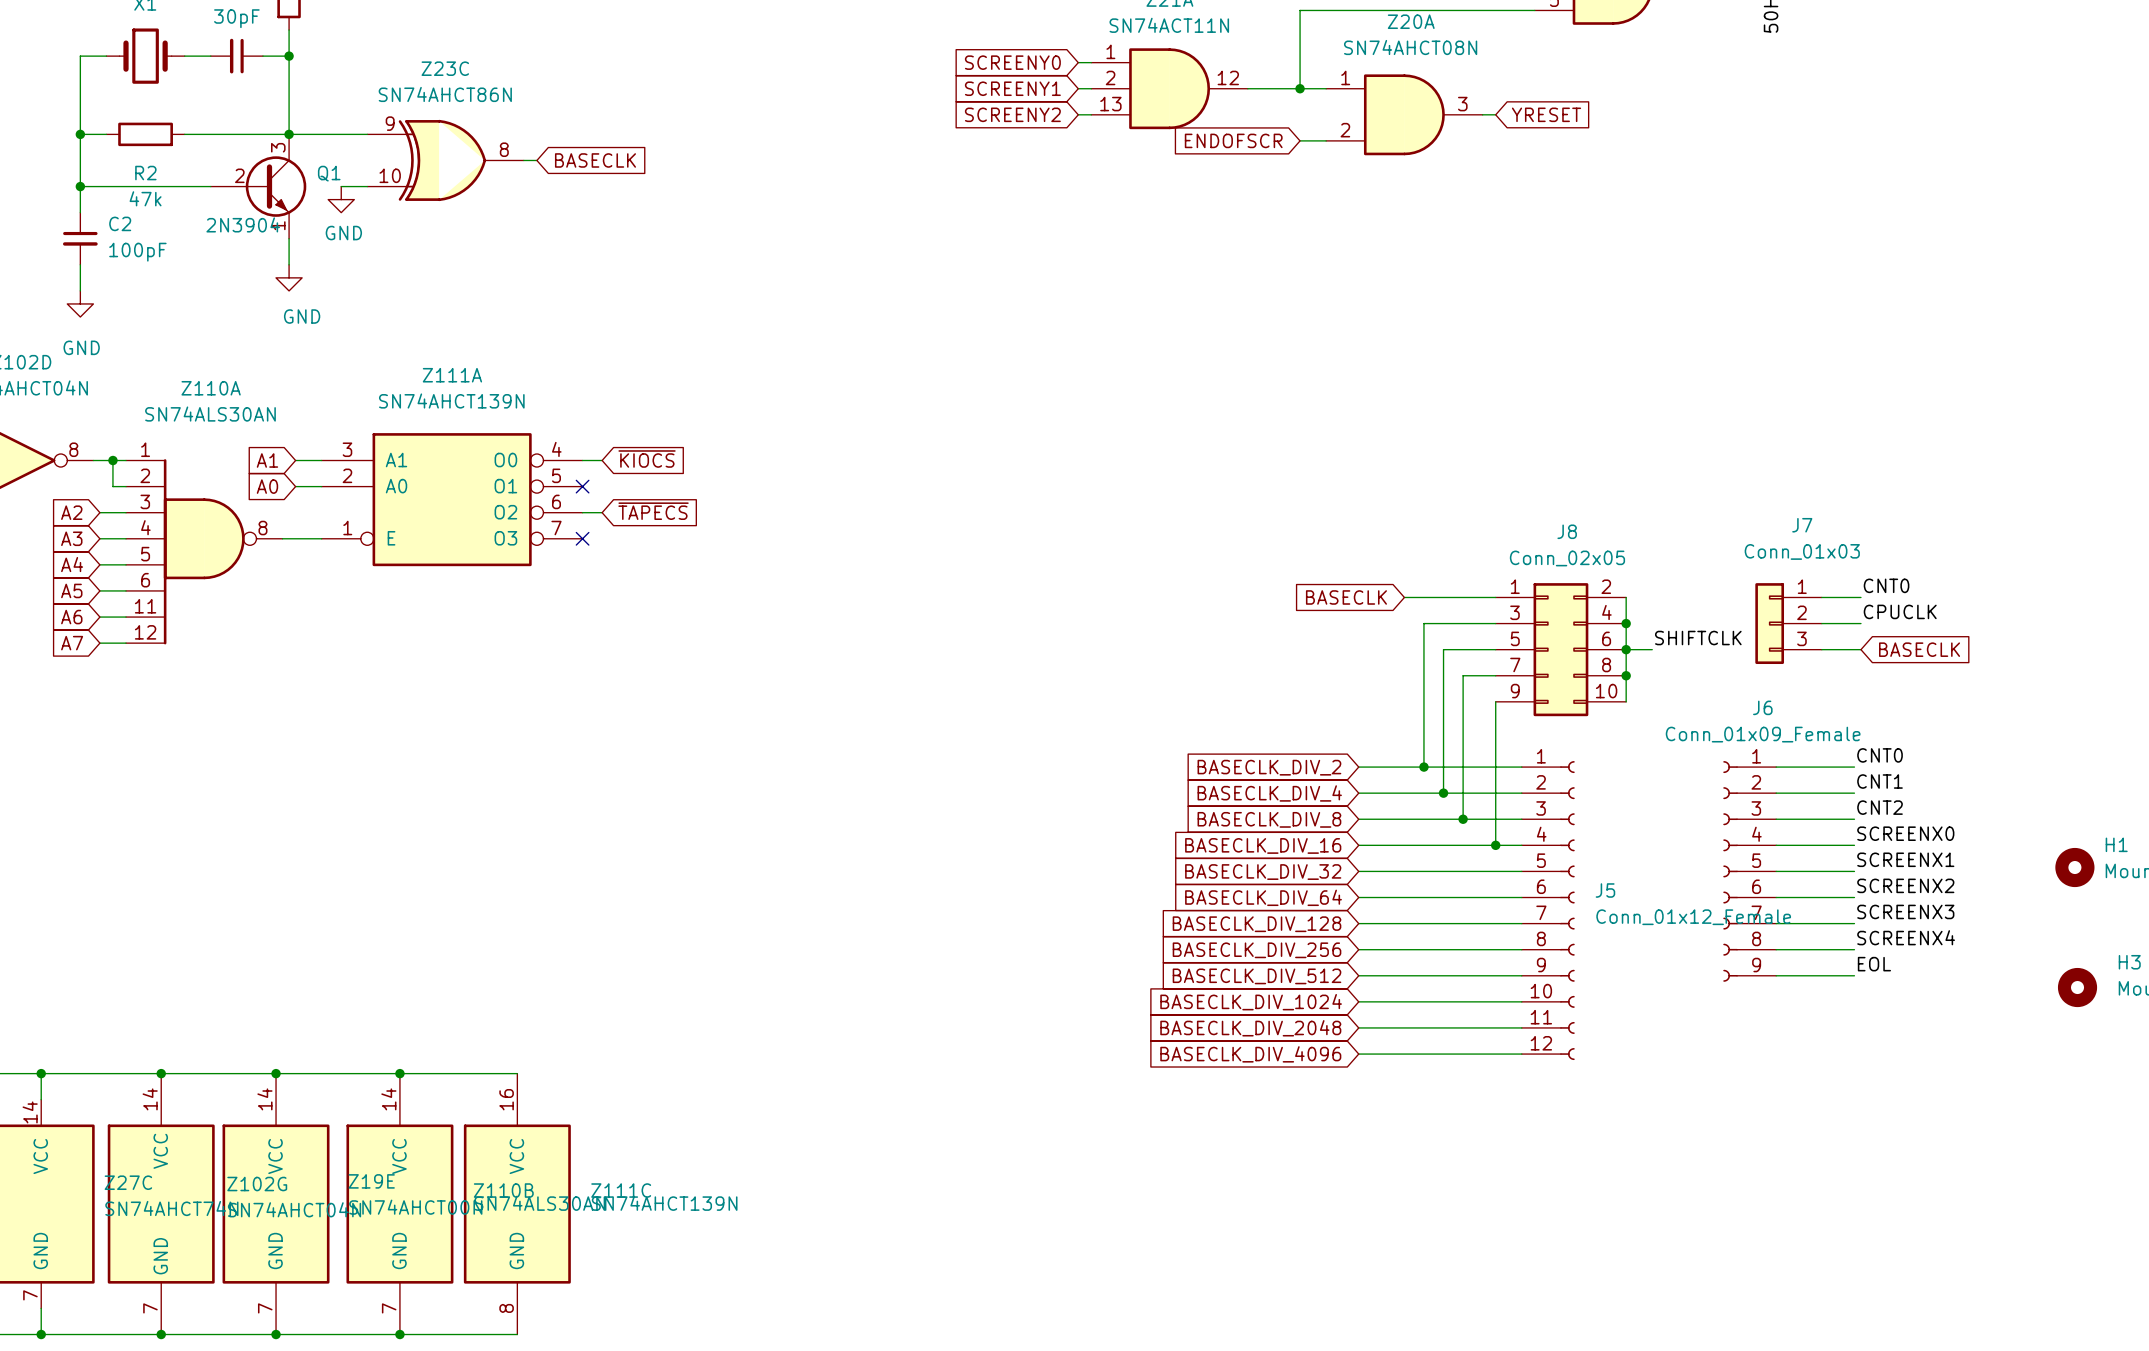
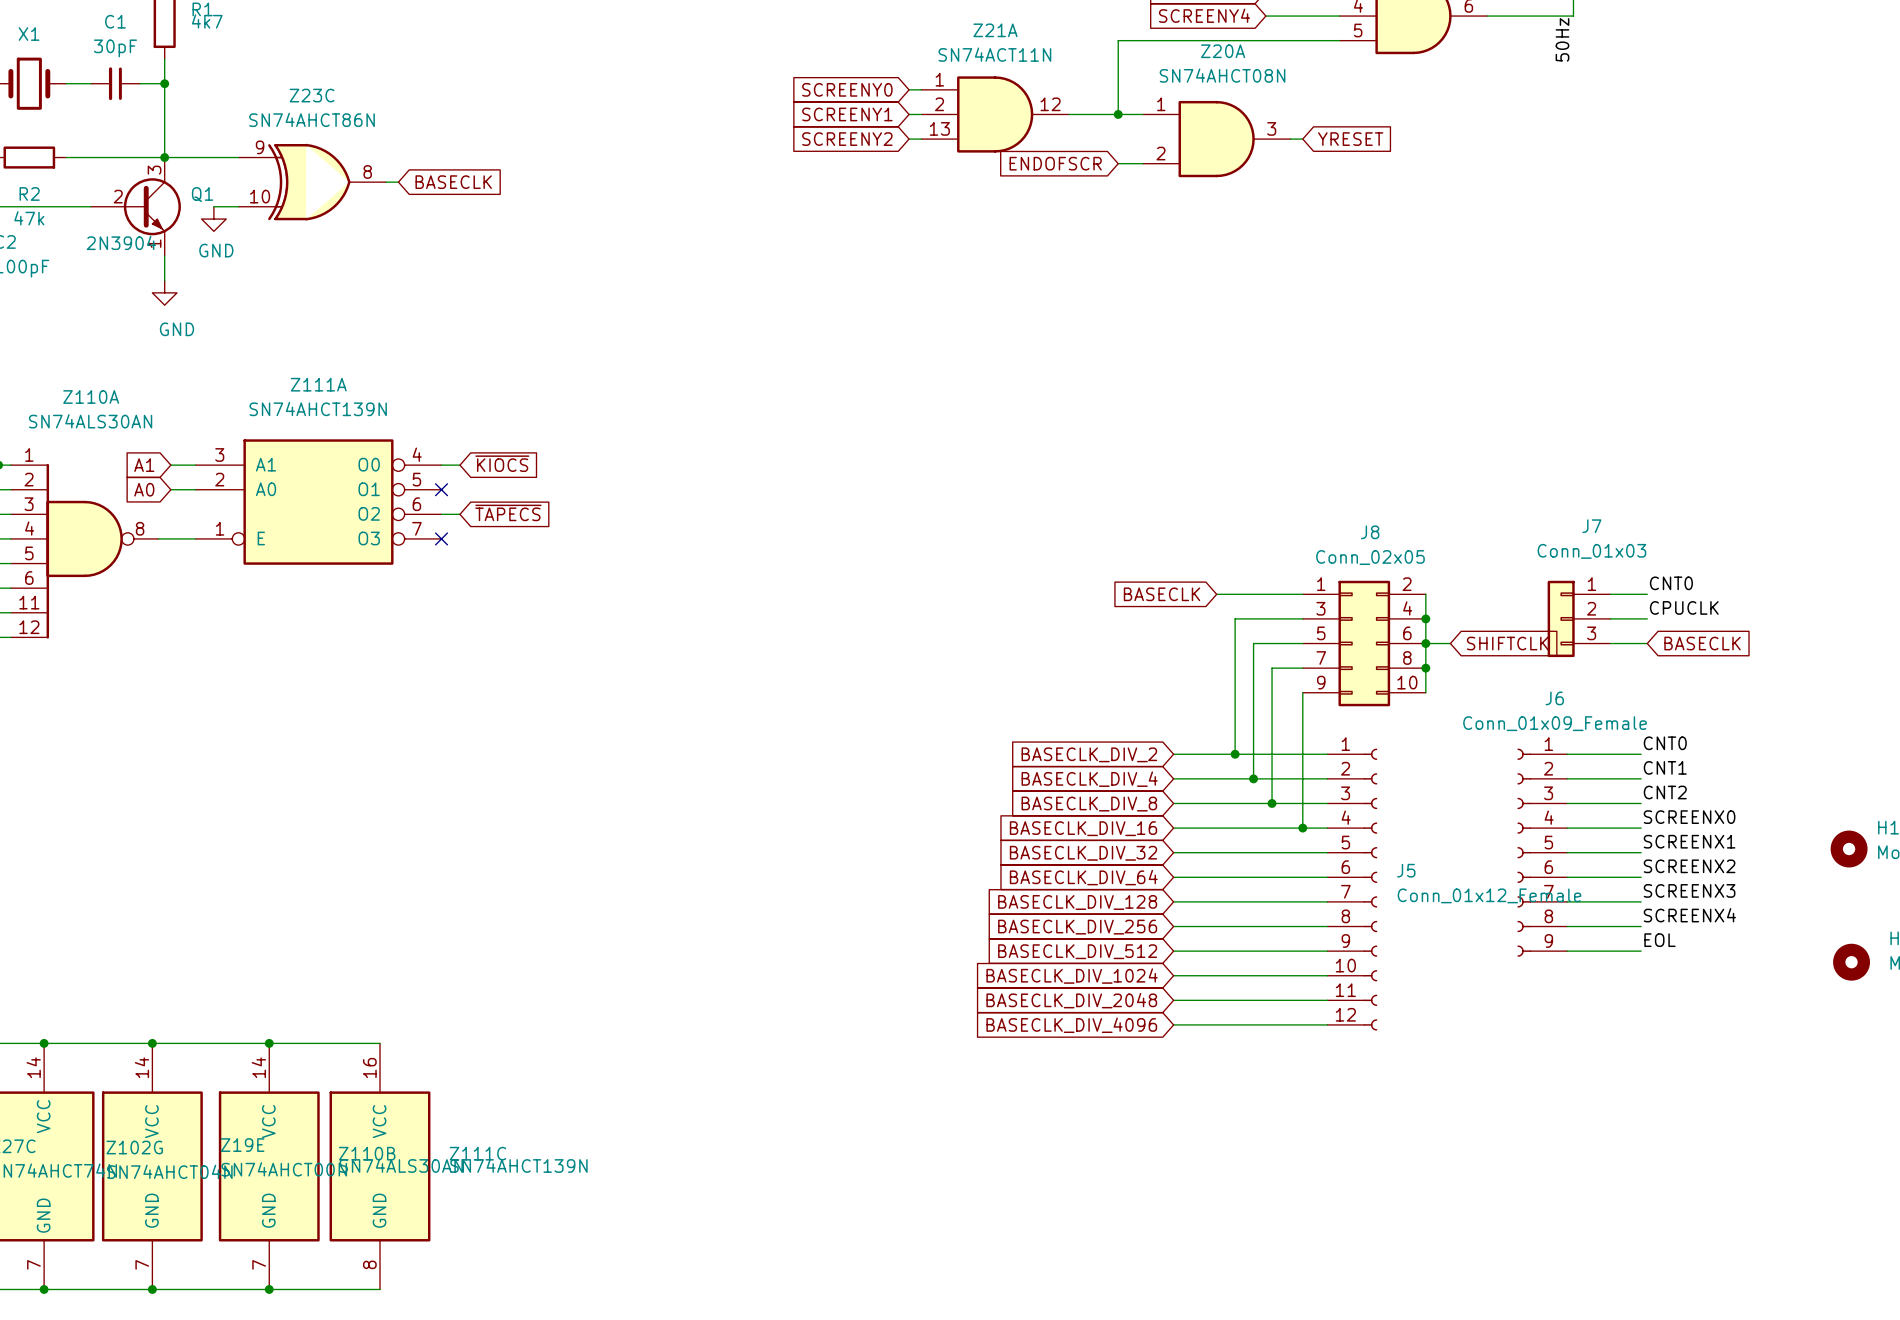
label: SHIFTCLK (1698, 638) -> none
global label: none -> SHIFTCLK (1507, 643)

